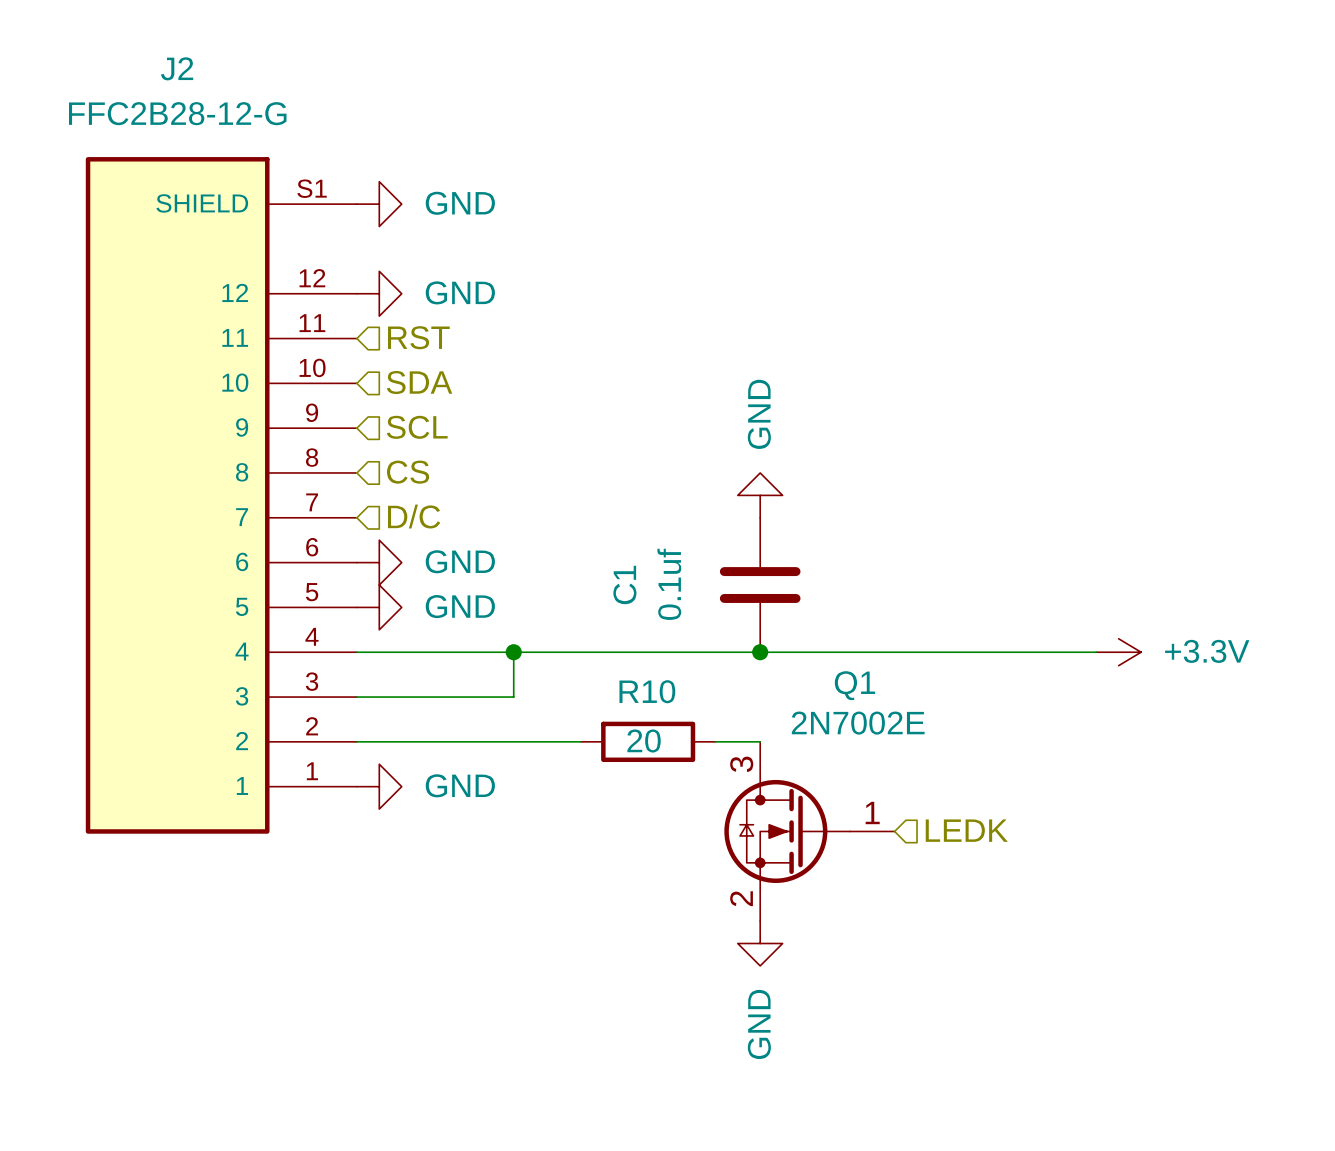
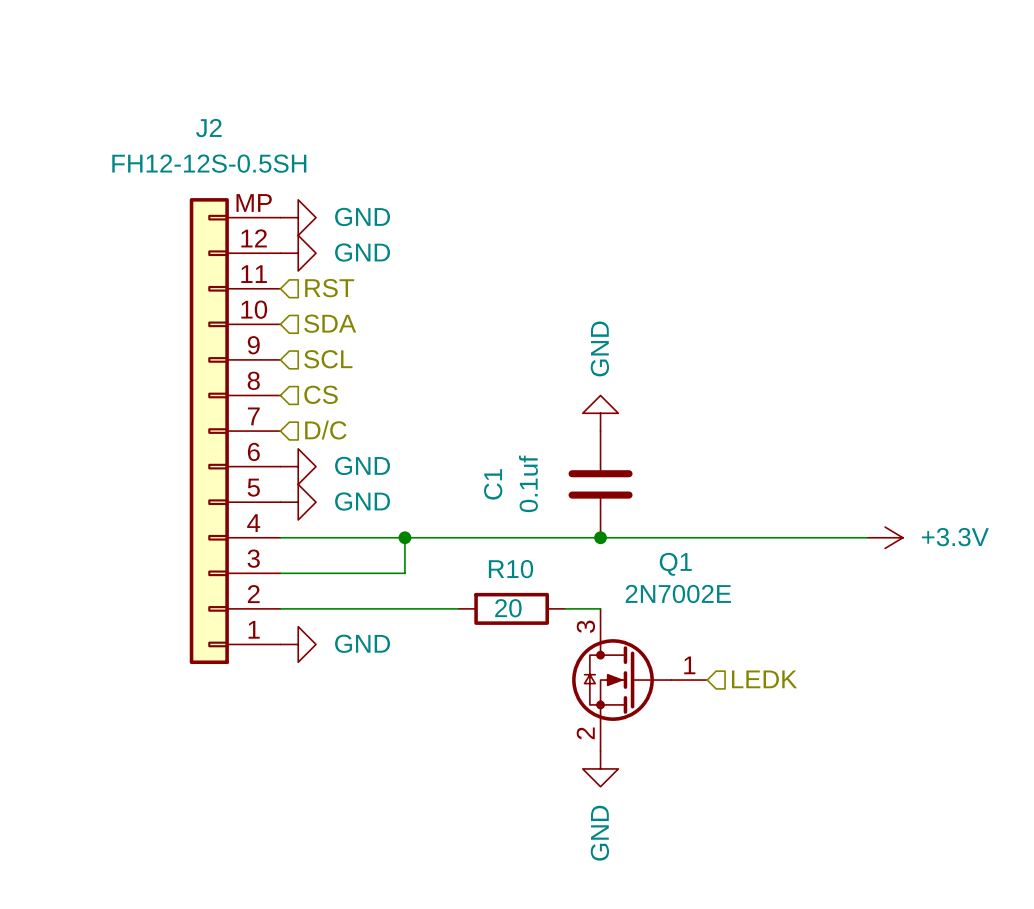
J2 name position: J2 (177, 68) -> J2 (208, 128)
J2 value: FFC2B28-12-G (177, 113) -> FH12-12S-0.5SH (209, 163)
J2 symbol: [85, 157, 357, 834] -> [189, 198, 281, 665]
power symbol position: GND (379, 204) -> GND (298, 217)

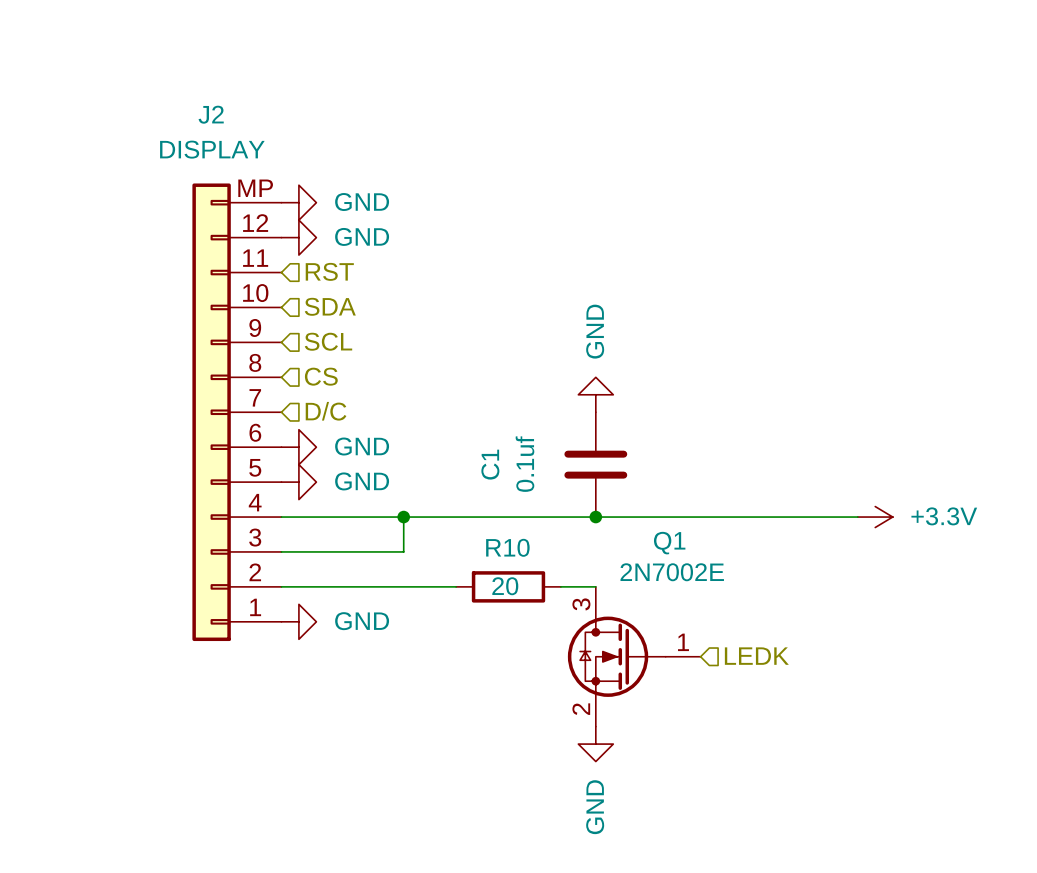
J2 value: FH12-12S-0.5SH (209, 163) -> DISPLAY (212, 149)

